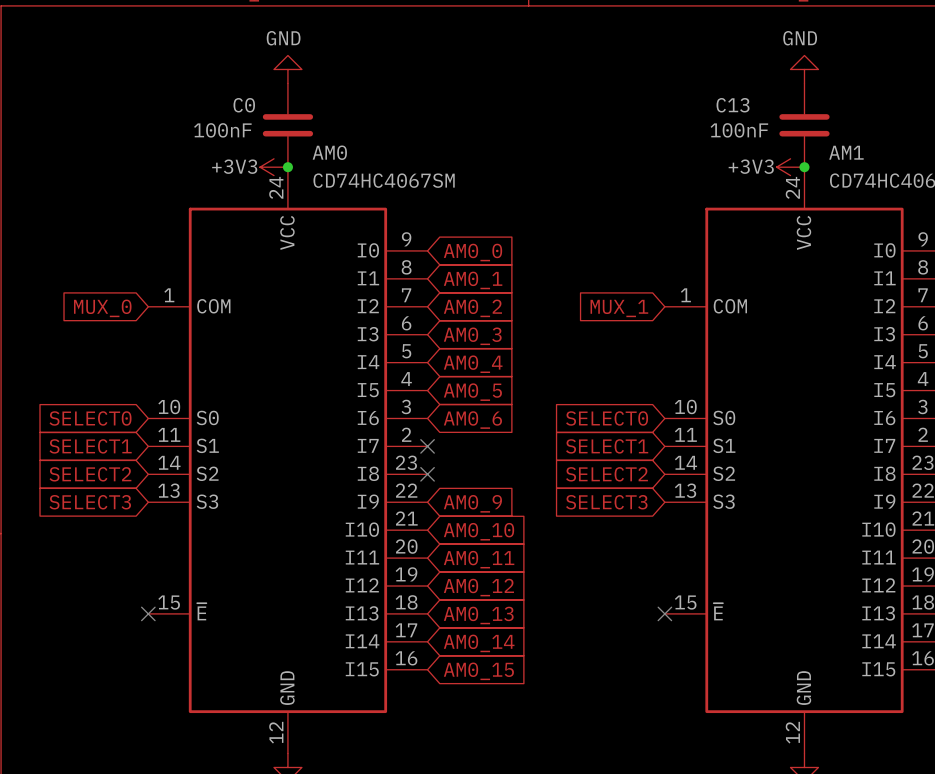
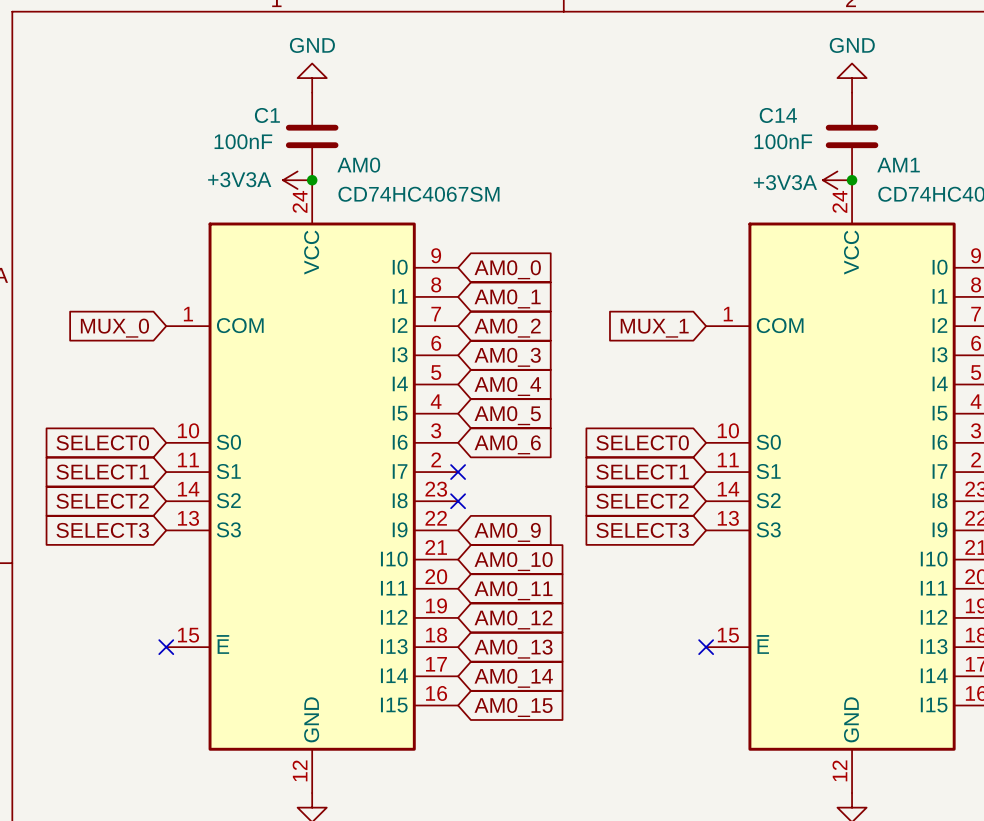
C0 name: C0 (244, 105) -> C1 (267, 115)
C13 name: C13 (733, 105) -> C14 (778, 115)
power symbol: +3V3 (273, 167) -> +3V3A (297, 180)
power symbol: +3V3 (790, 167) -> +3V3A (837, 180)

